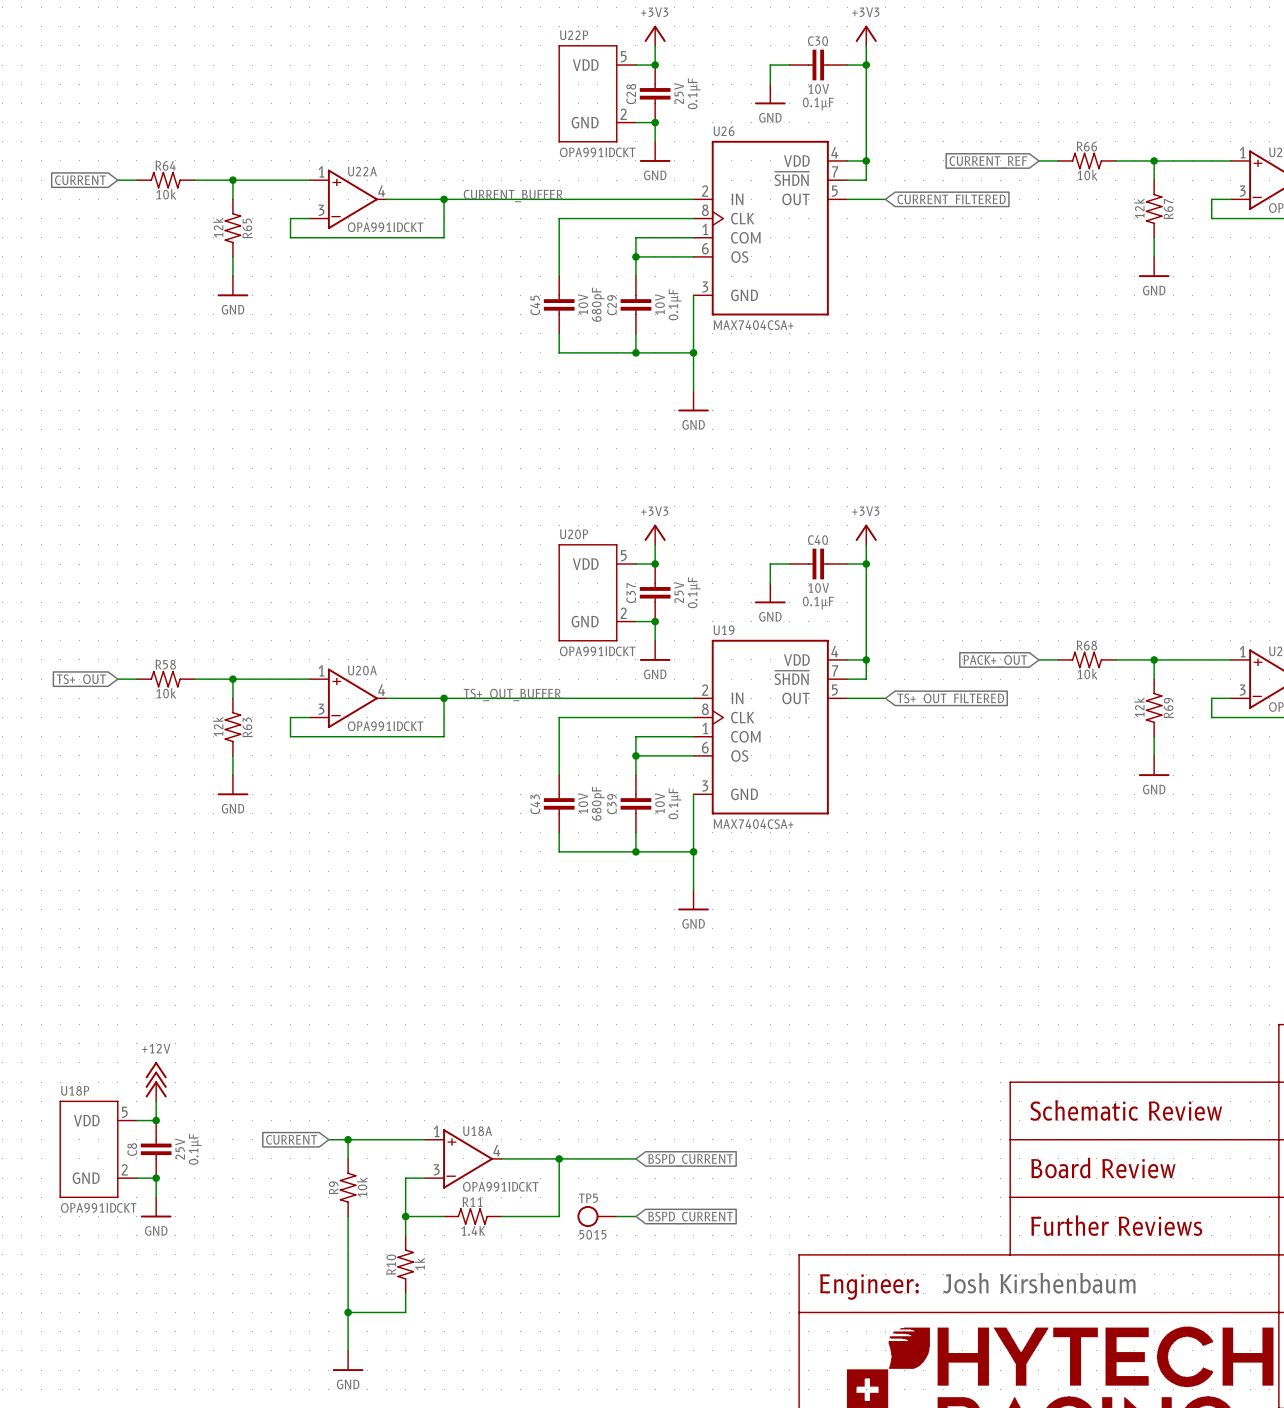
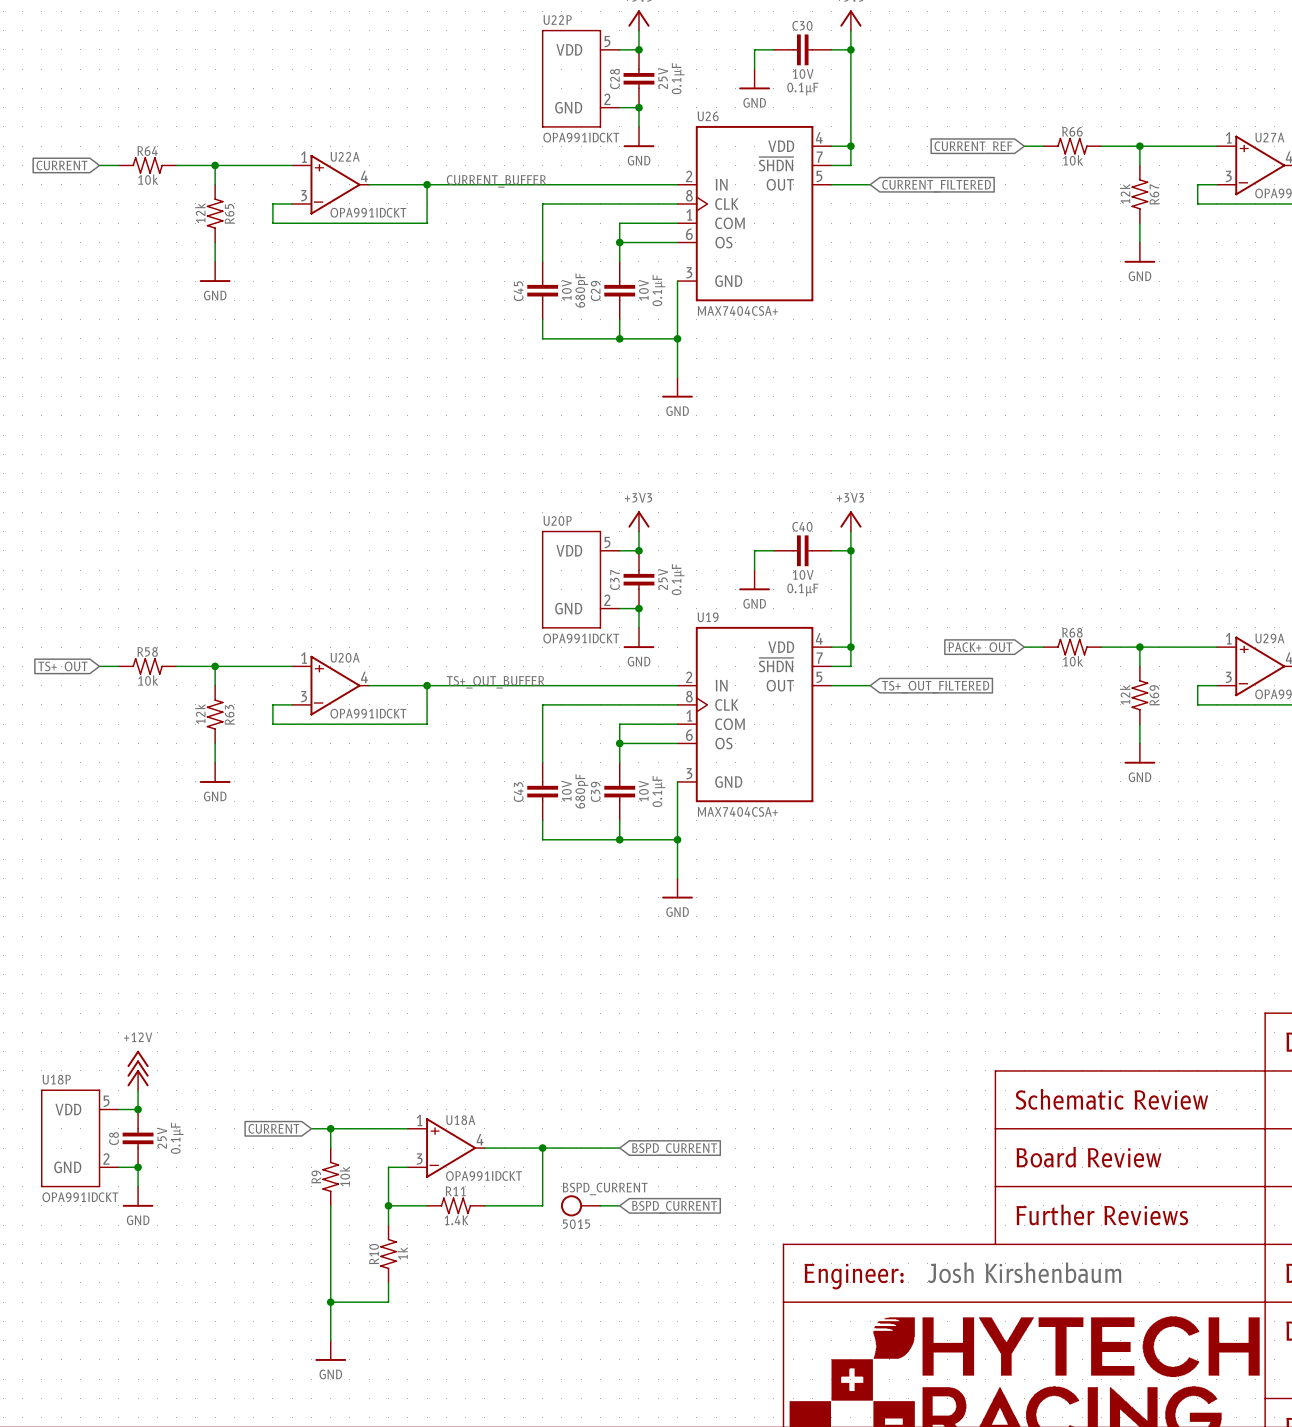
TP5 name: TP5 (588, 1198) -> BSPD_CURRENT (605, 1188)

